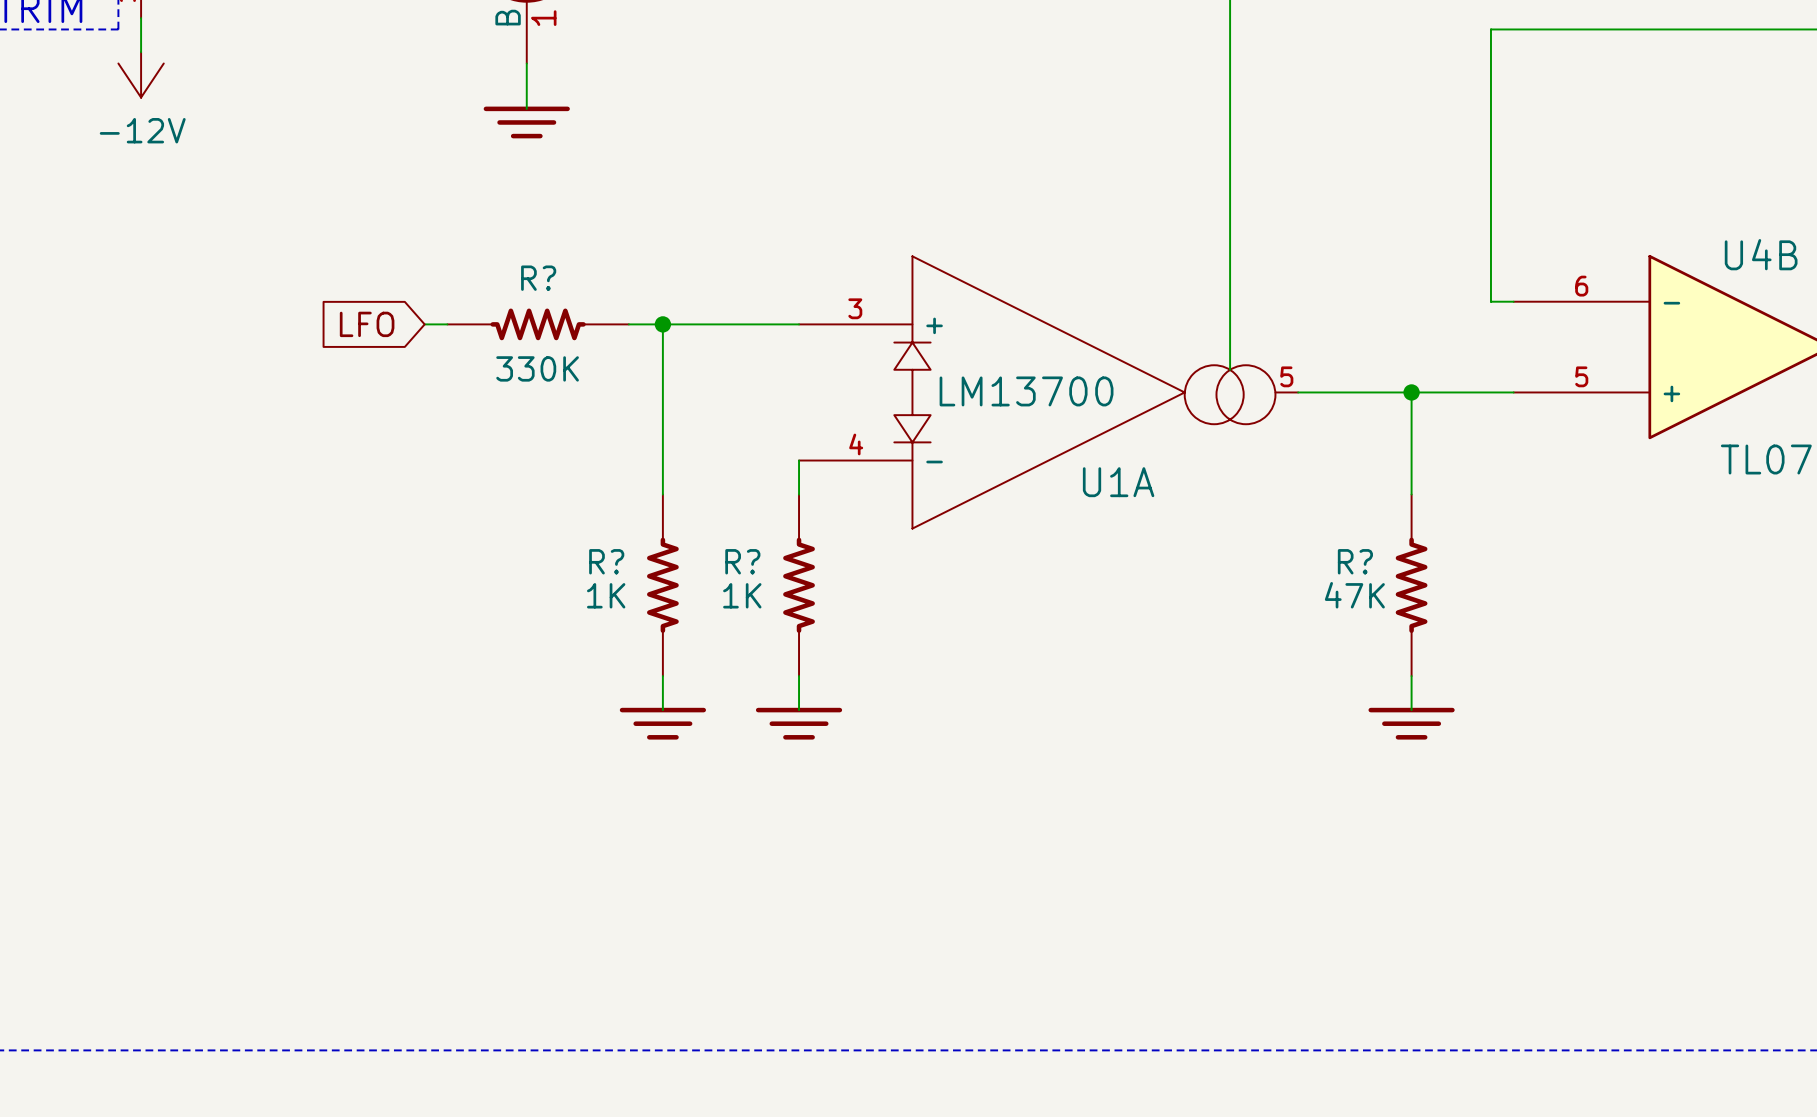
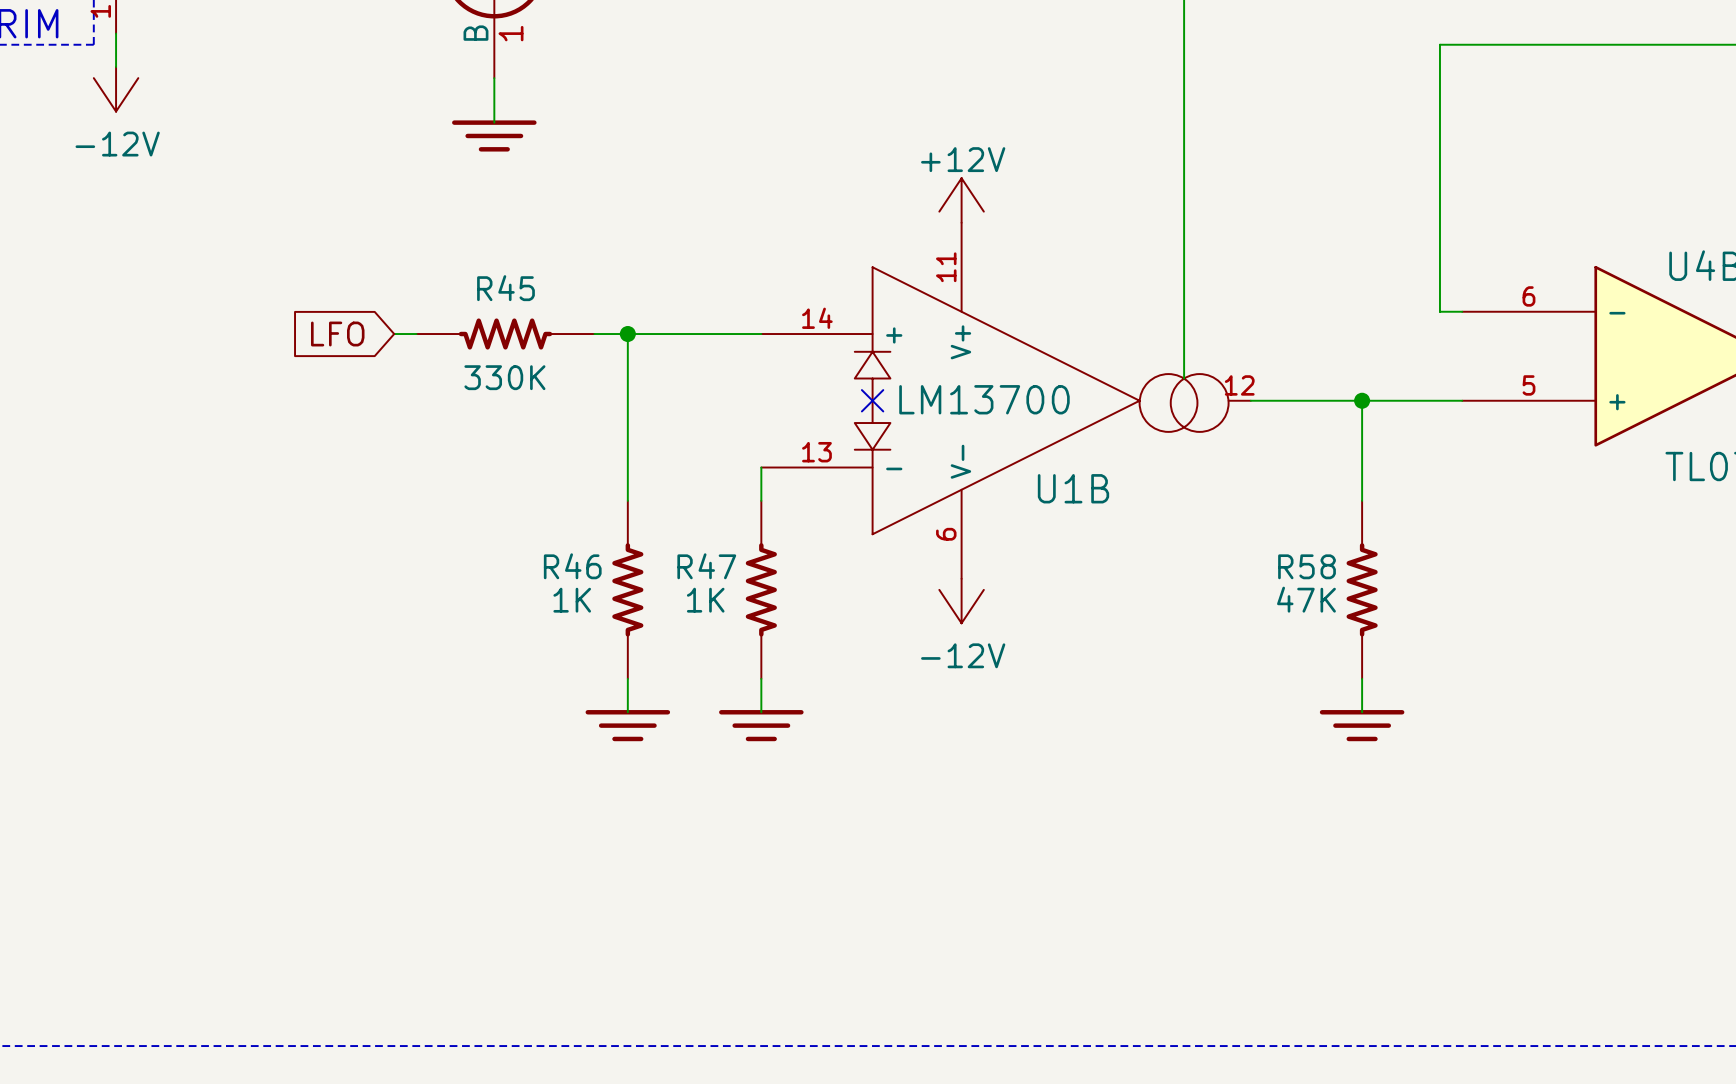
power symbol: none -> +12V (961, 200)
R? name: R? (538, 278) -> R45 (505, 288)
no-connect mark: none -> (872, 400)
U1A: LM13700 (1048, 392) -> none
U1B: none -> LM13700 (1006, 400)
R? name: R? (606, 561) -> R46 (572, 566)
R? name: R? (742, 561) -> R47 (706, 566)
R? name: R? (1355, 561) -> R58 (1307, 566)
power symbol: none -> -12V (961, 601)

